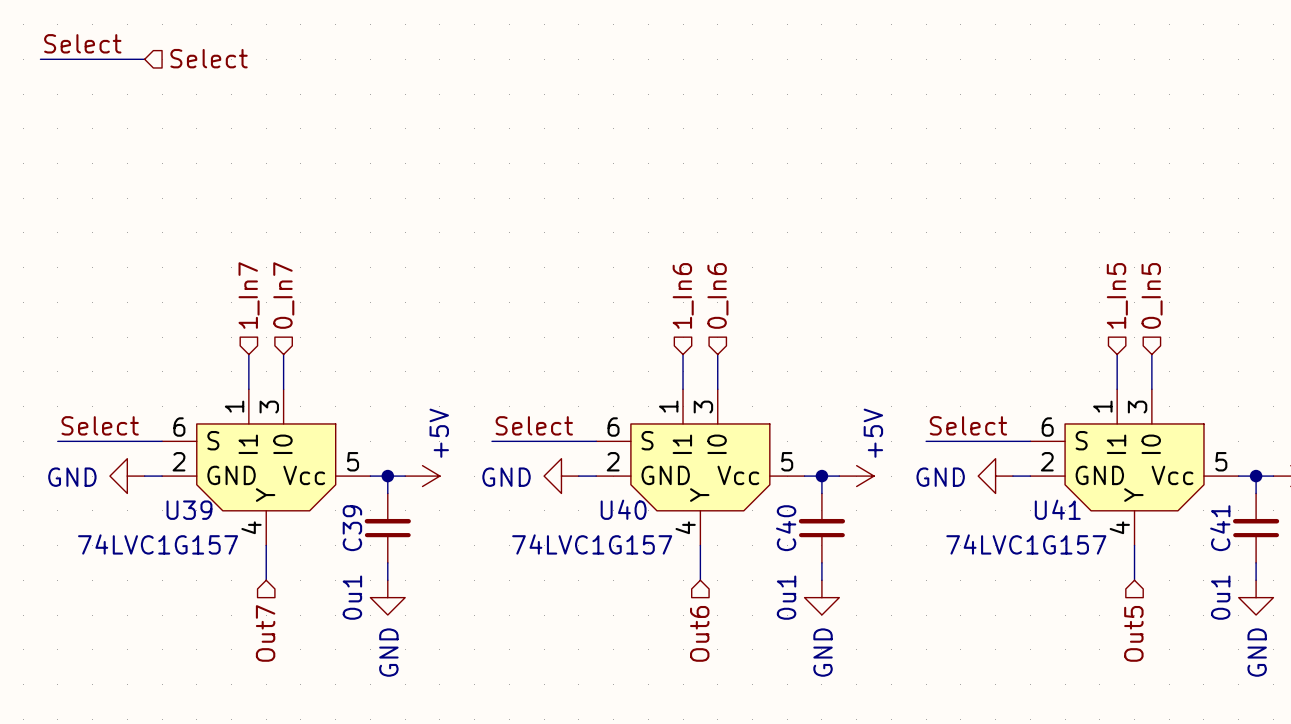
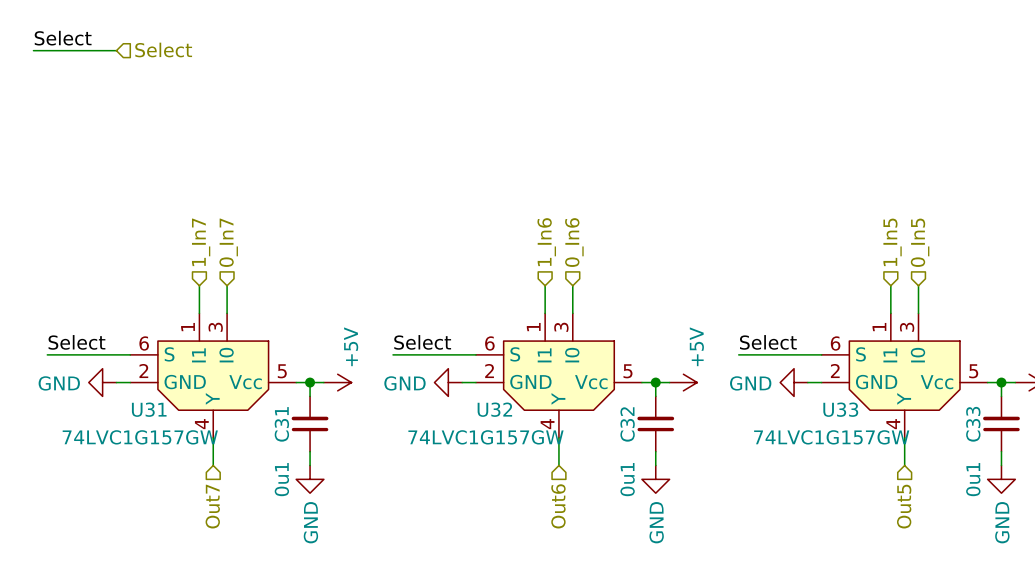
U40 name: U40 (623, 509) -> U32 (494, 409)
U41 name: U41 (1057, 509) -> U33 (840, 409)
U39 name: U39 (189, 510) -> U31 (149, 409)
C39 name: C39 (352, 528) -> C31 (281, 424)
C40 name: C40 (786, 528) -> C32 (627, 424)
C41 name: C41 (1220, 528) -> C33 (973, 424)
U39 value: 74LVC1G157 (158, 544) -> 74LVC1G157GW (140, 437)
U40 value: 74LVC1G157 (592, 544) -> 74LVC1G157GW (485, 437)
U41 value: 74LVC1G157 (1026, 544) -> 74LVC1G157GW (831, 437)

